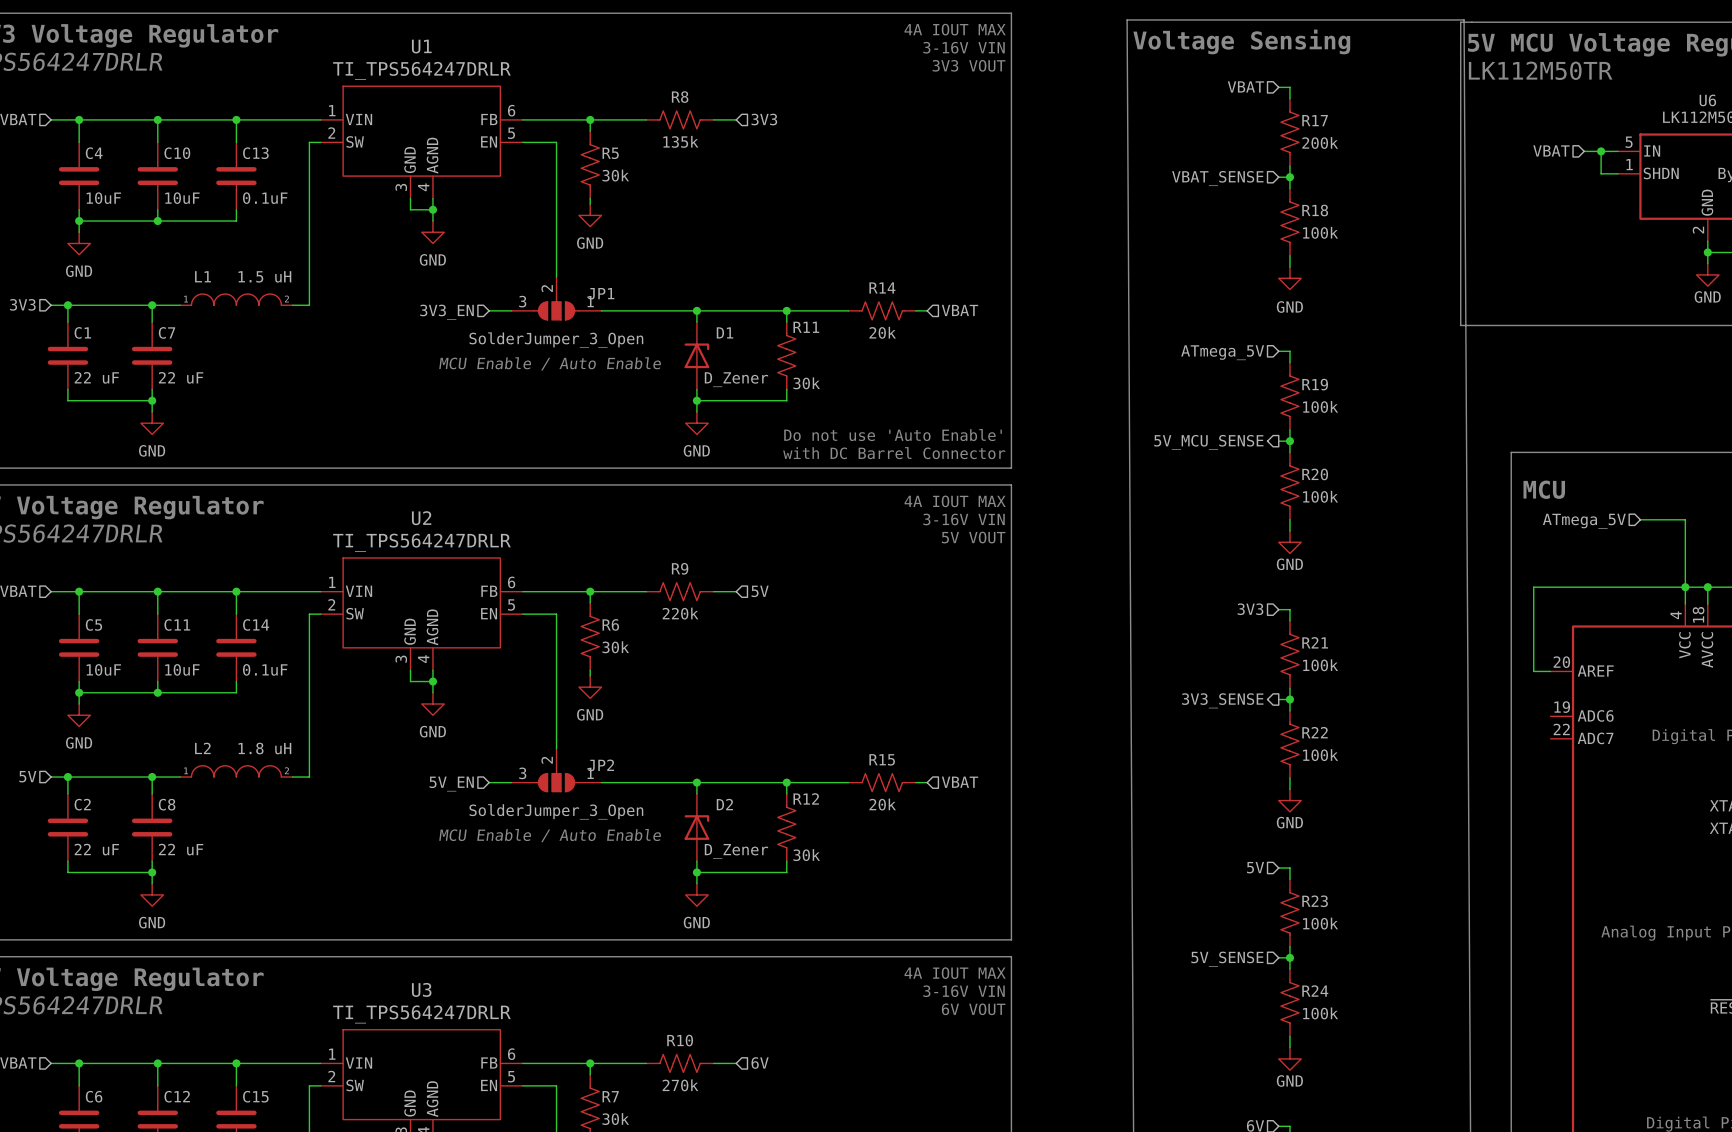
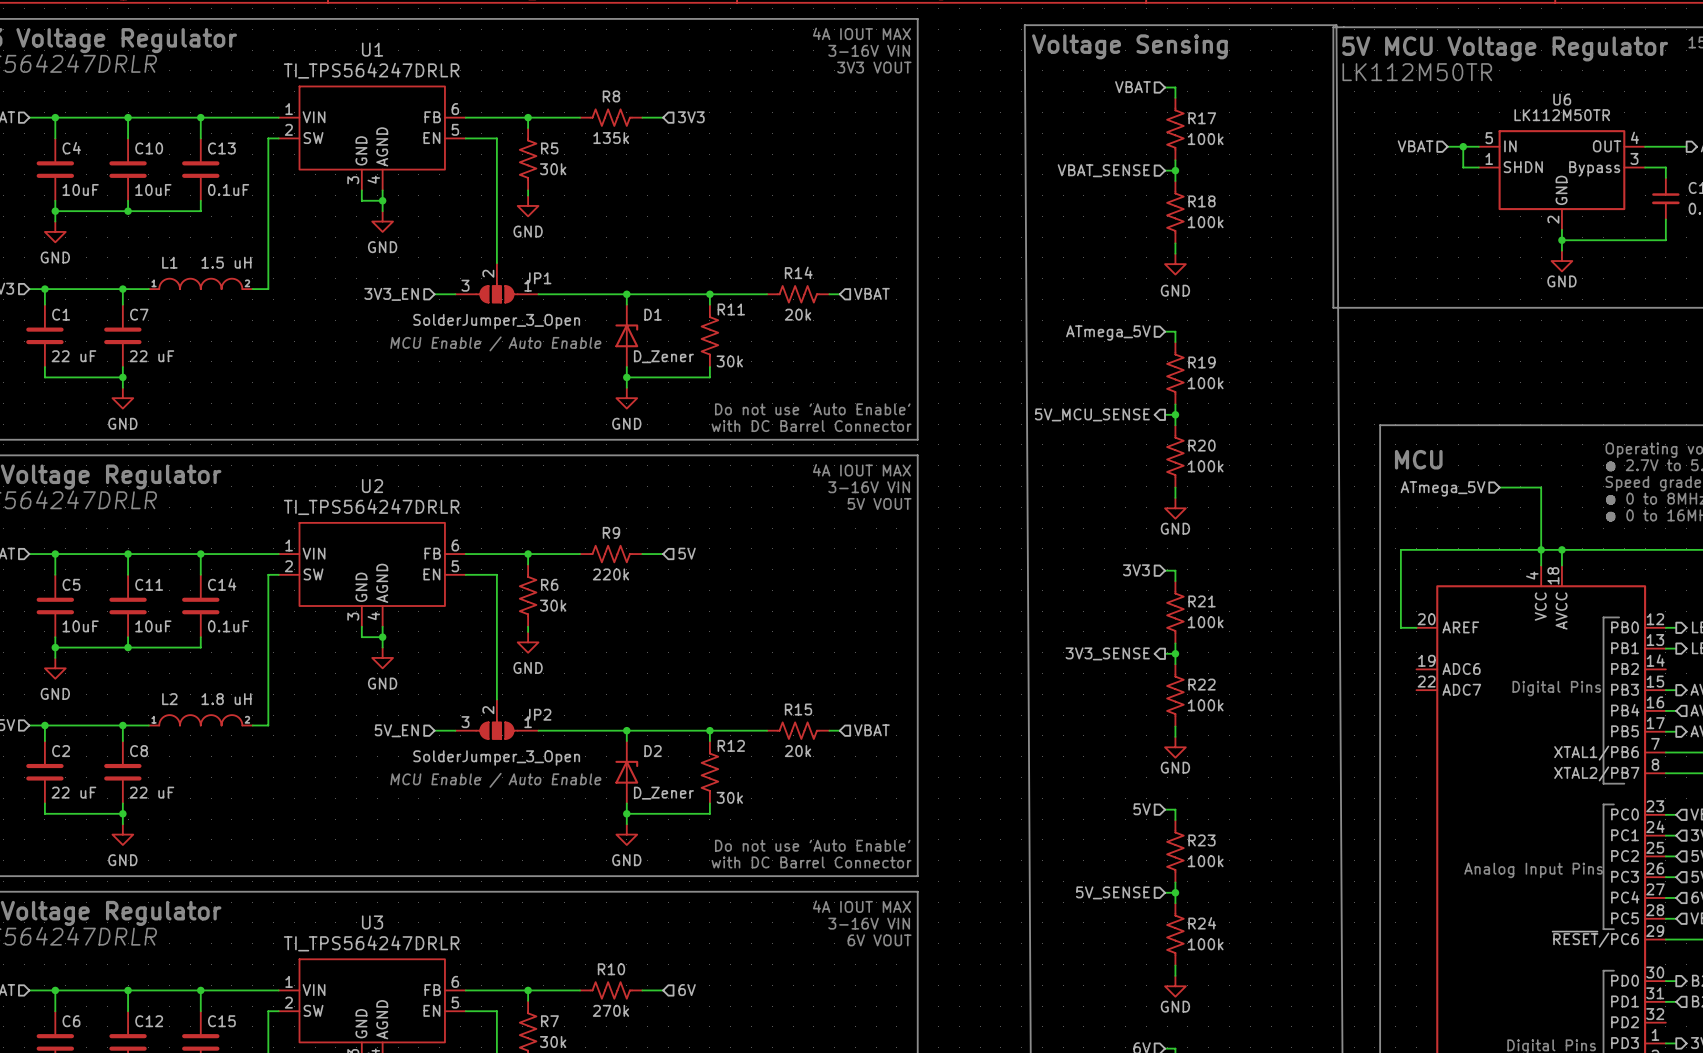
R17 value: 200k (1320, 142) -> 100k (1205, 139)
text: none -> Do not use 'Auto Enable' (812, 845)
text: none -> with DC Barrel Connector (811, 862)

